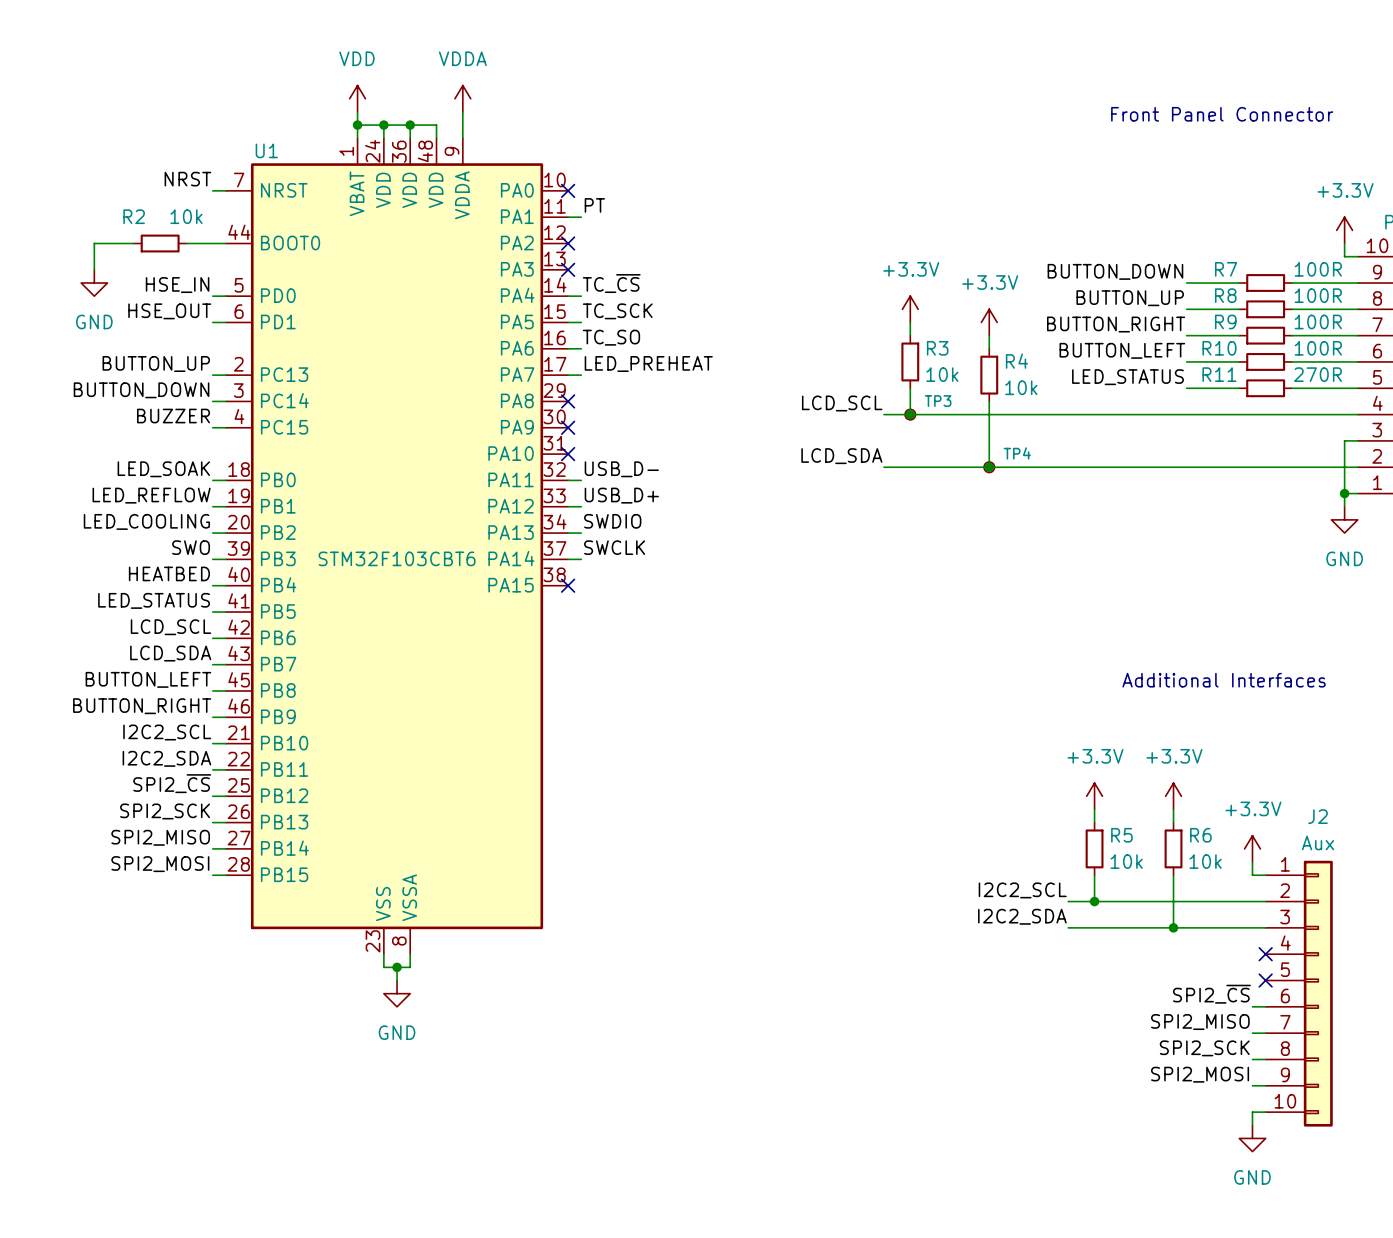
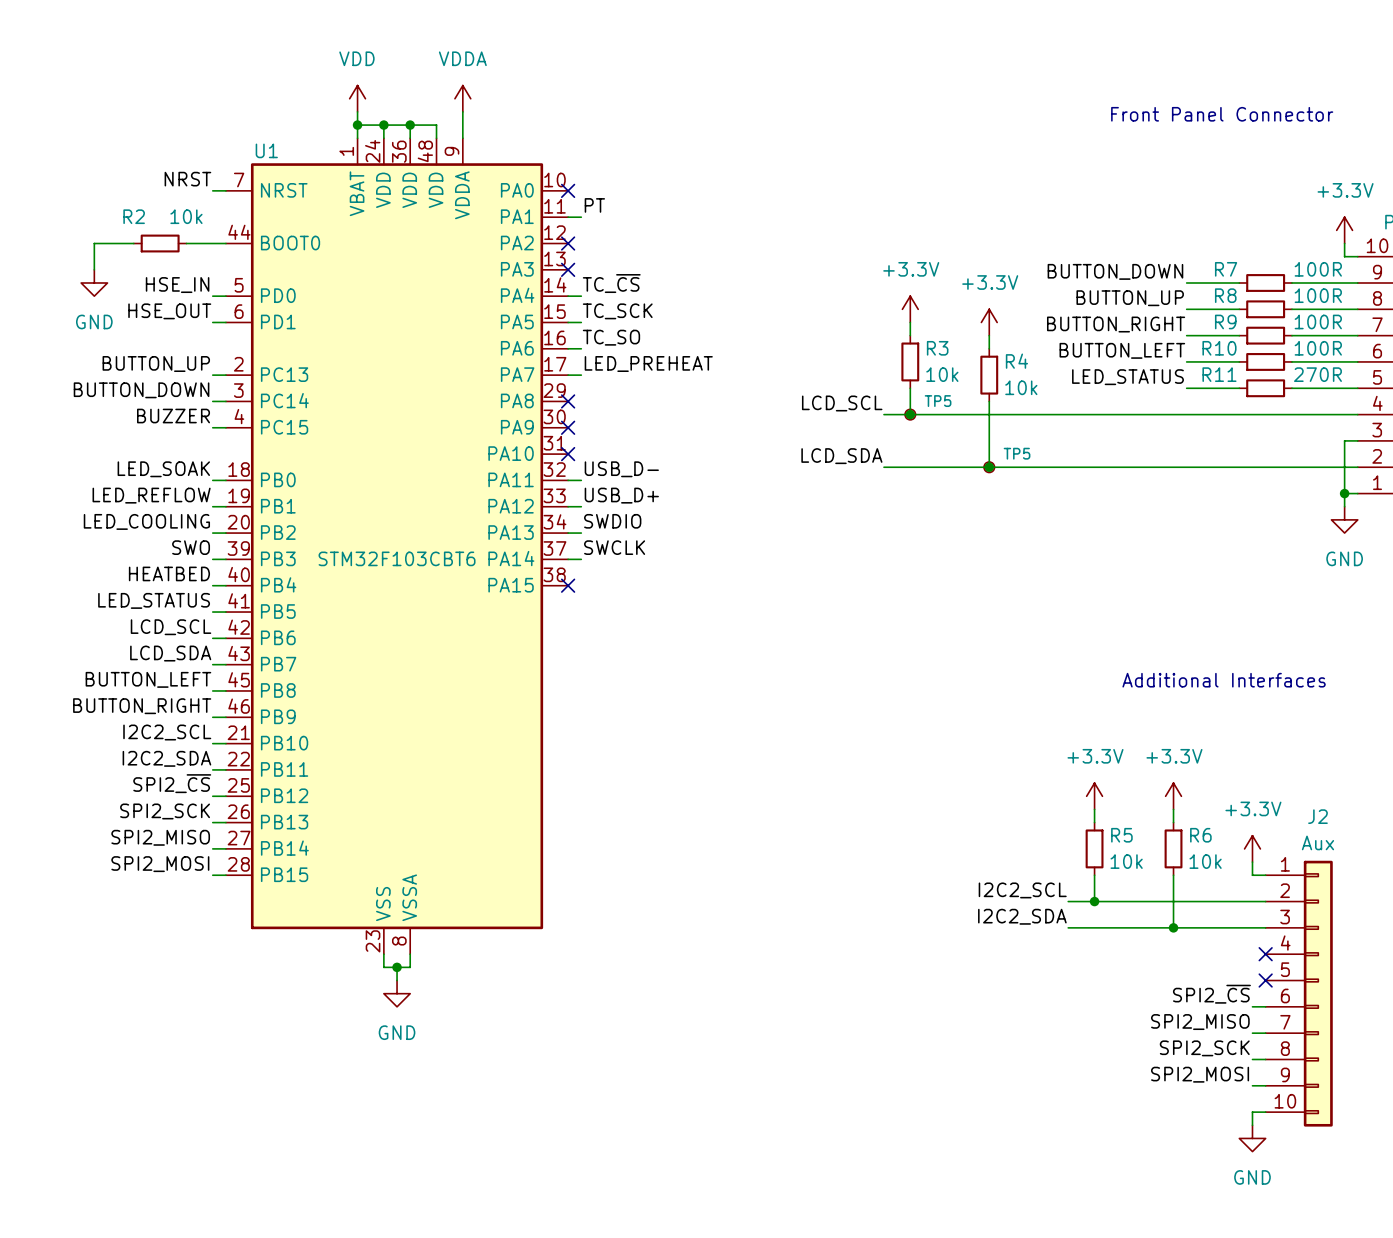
TP3 name: TP3 (938, 401) -> TP5 (938, 401)
TP4 name: TP4 (1017, 453) -> TP5 (1017, 453)

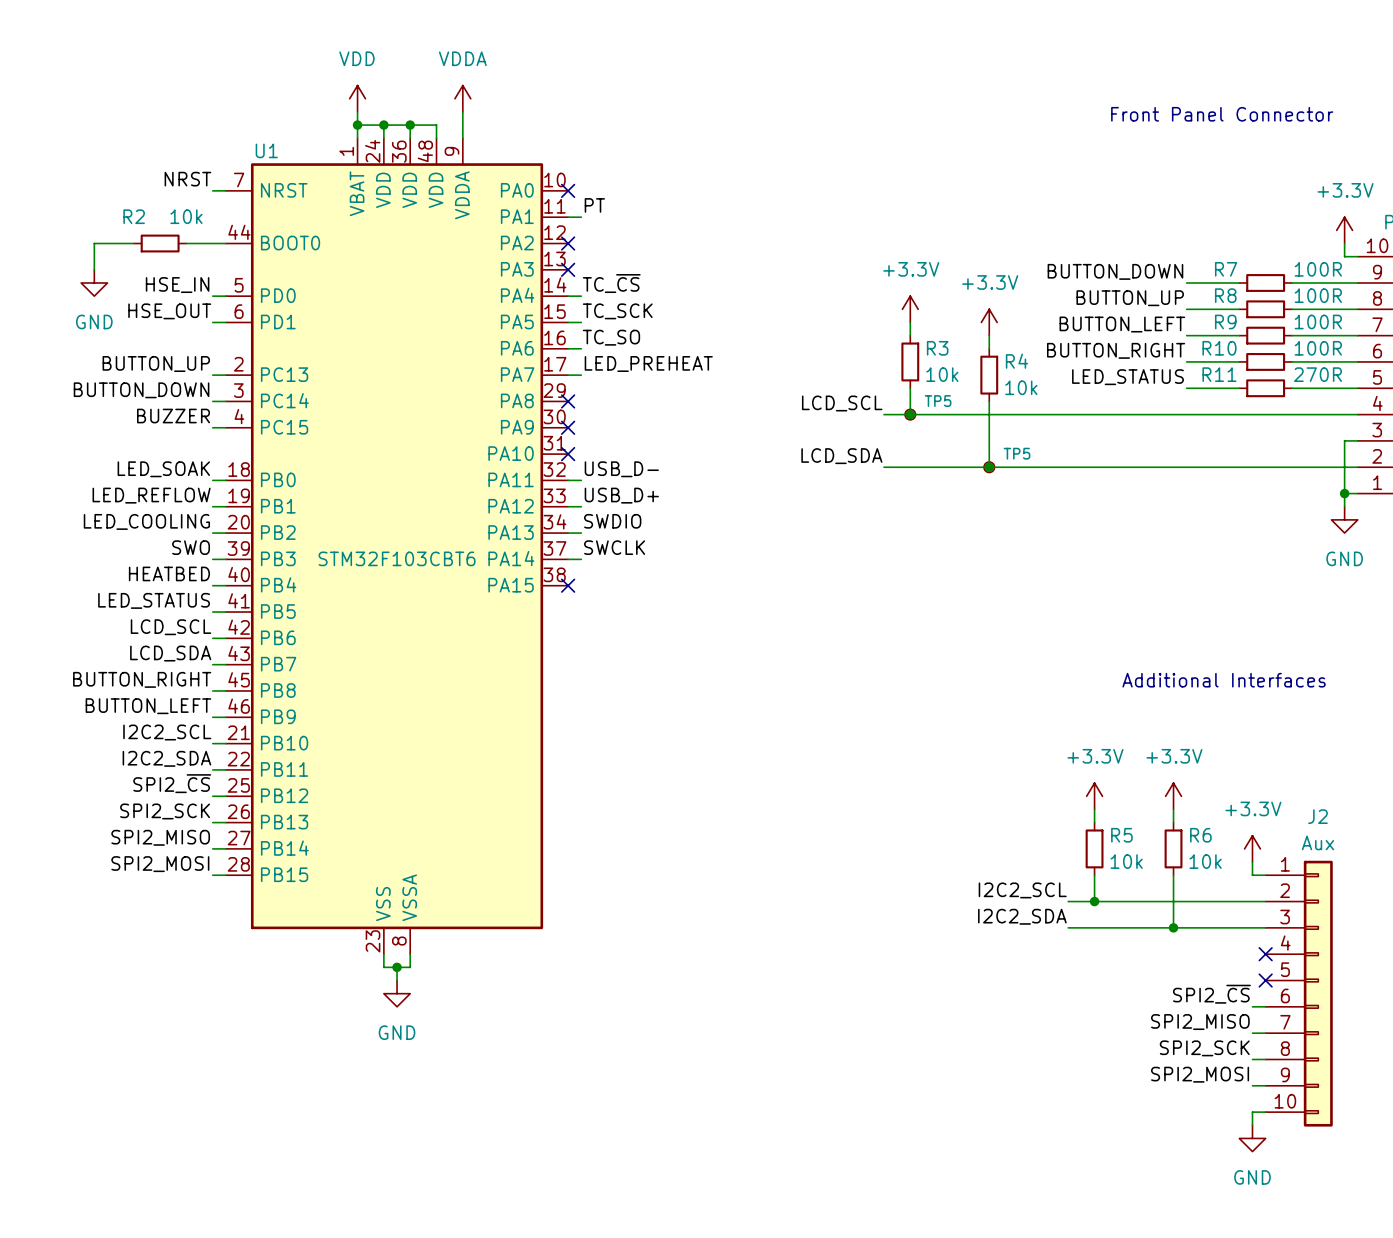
label: BUTTON_RIGHT (1116, 324) -> BUTTON_LEFT (1122, 324)
label: BUTTON_LEFT (1122, 350) -> BUTTON_RIGHT (1116, 350)
label: BUTTON_LEFT (148, 679) -> BUTTON_RIGHT (142, 679)
label: BUTTON_RIGHT (142, 706) -> BUTTON_LEFT (148, 706)

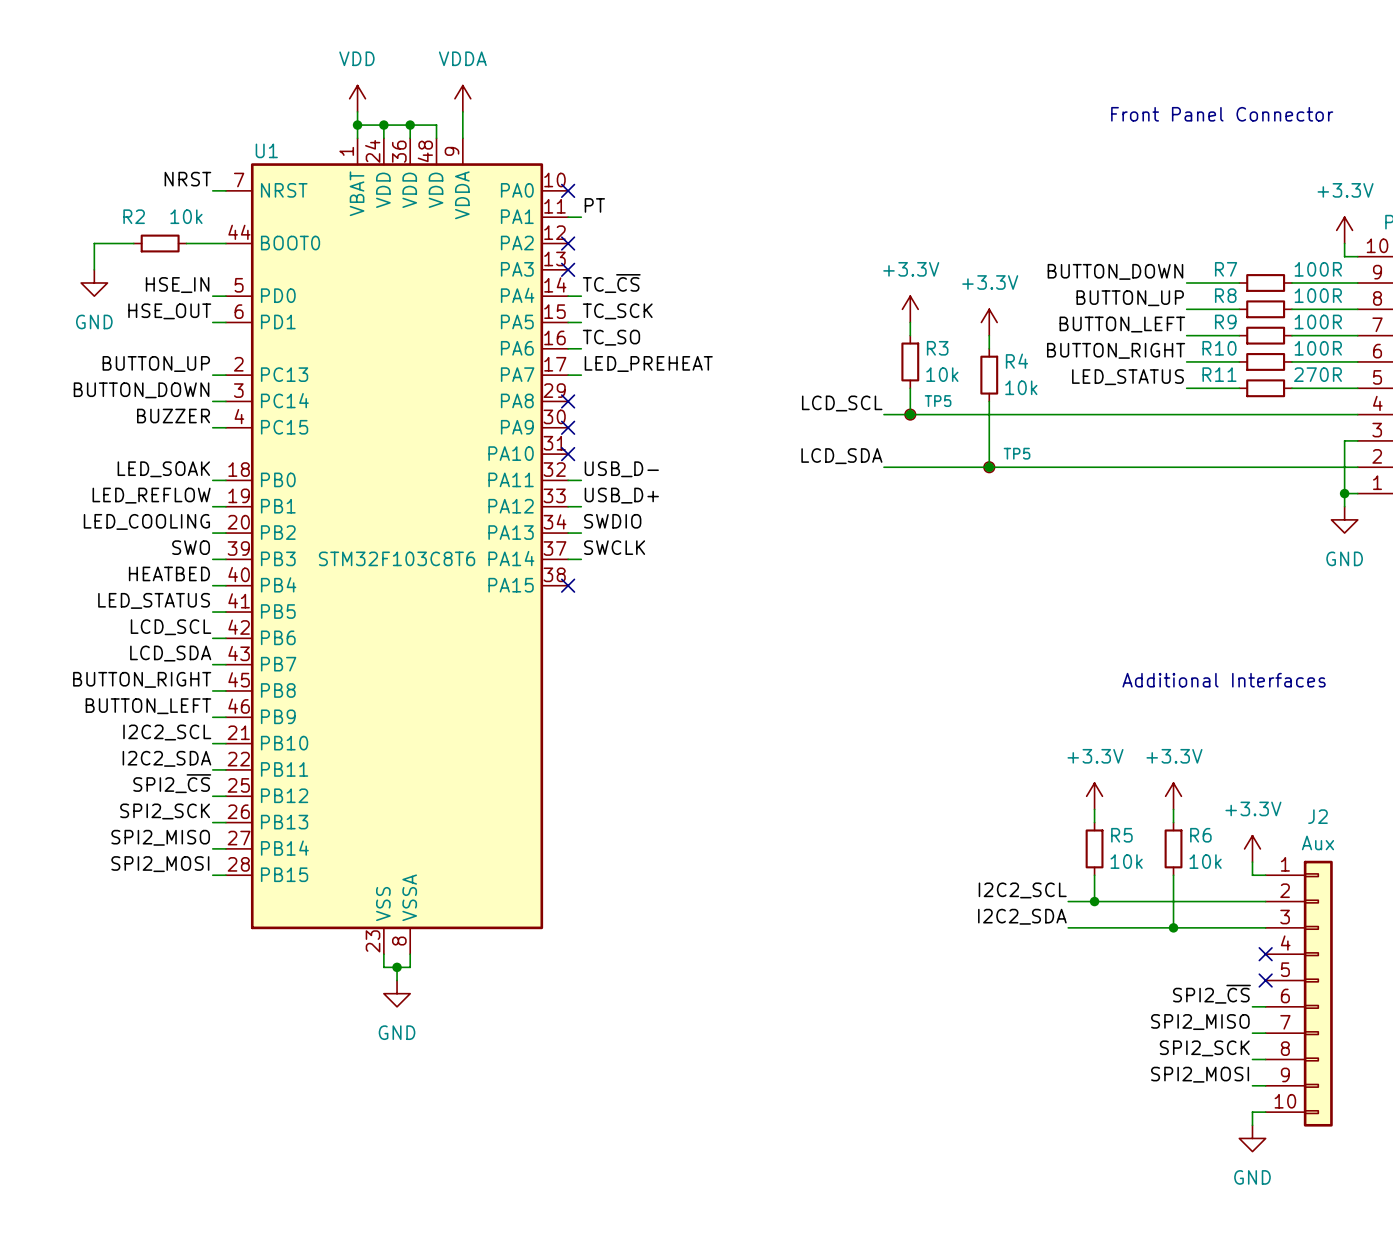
U1 value: STM32F103CBT6 (397, 558) -> STM32F103C8T6 (397, 558)

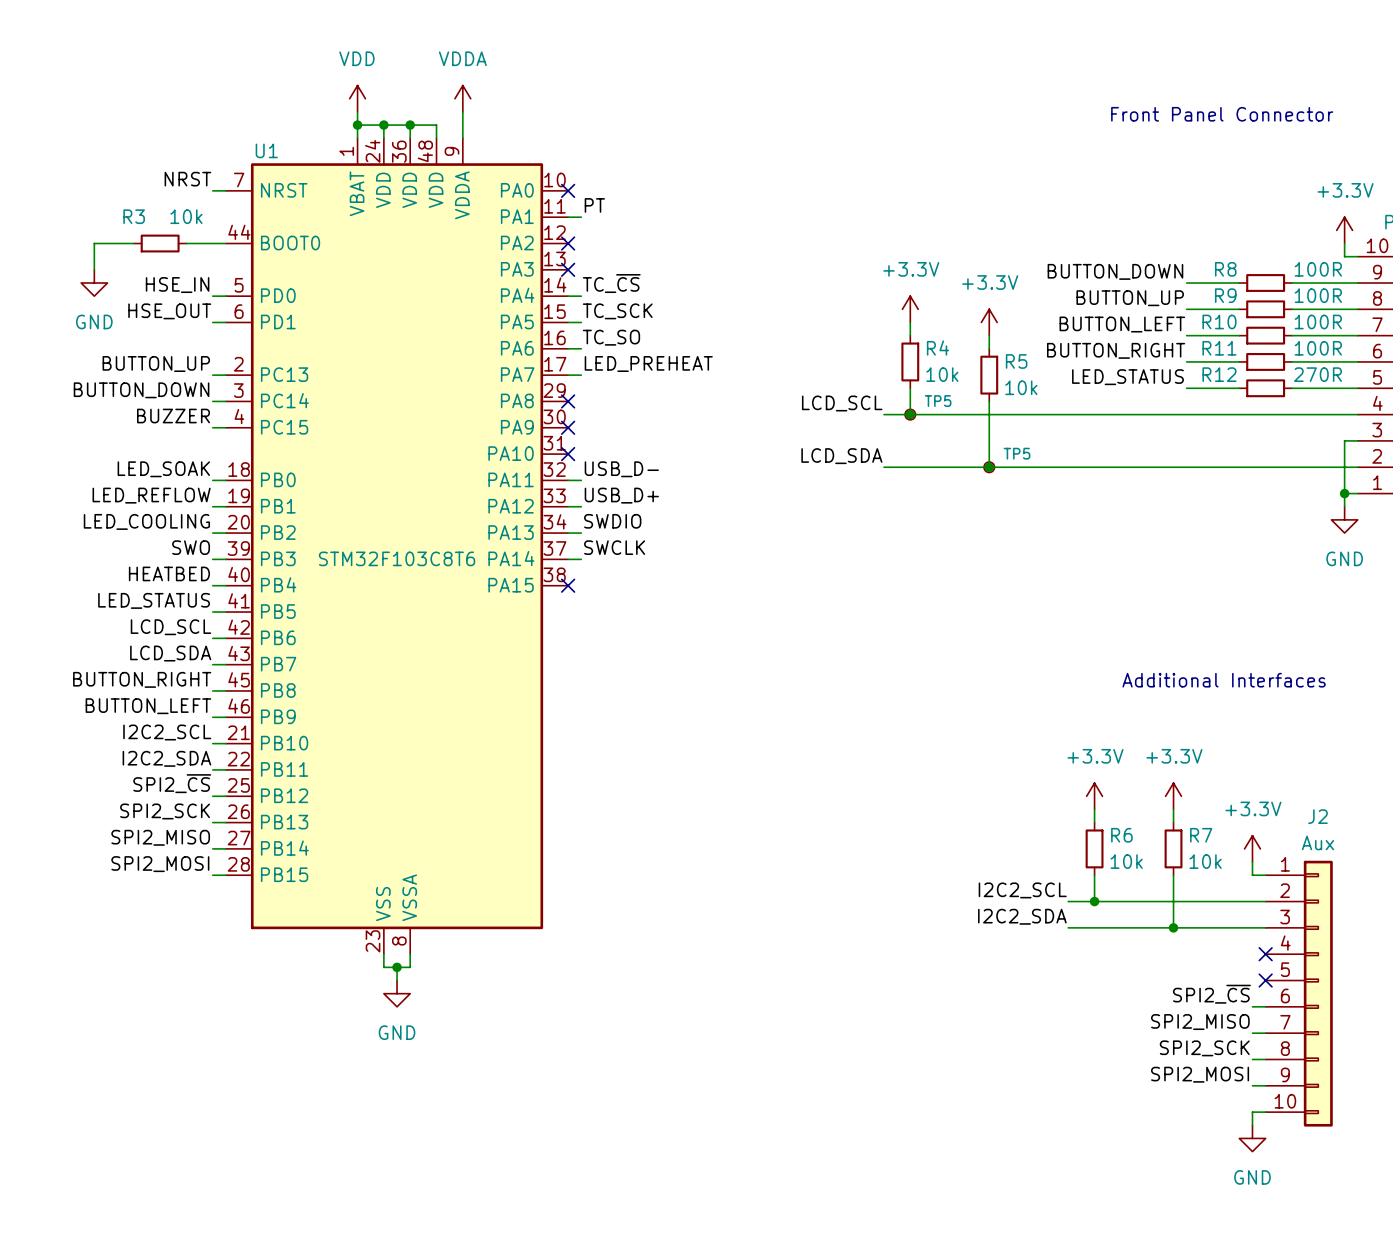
R2 name: R2 (134, 216) -> R3 (134, 216)
R7 name: R7 (1226, 269) -> R8 (1225, 269)
R8 name: R8 (1225, 295) -> R9 (1225, 295)
R9 name: R9 (1225, 321) -> R10 (1219, 321)
R3 name: R3 (937, 348) -> R4 (937, 347)
R10 name: R10 (1219, 348) -> R11 (1219, 348)
R4 name: R4 (1016, 361) -> R5 (1016, 361)
R11 name: R11 (1219, 374) -> R12 (1219, 374)
R5 name: R5 (1121, 835) -> R6 (1121, 835)
R6 name: R6 (1200, 835) -> R7 (1201, 835)

